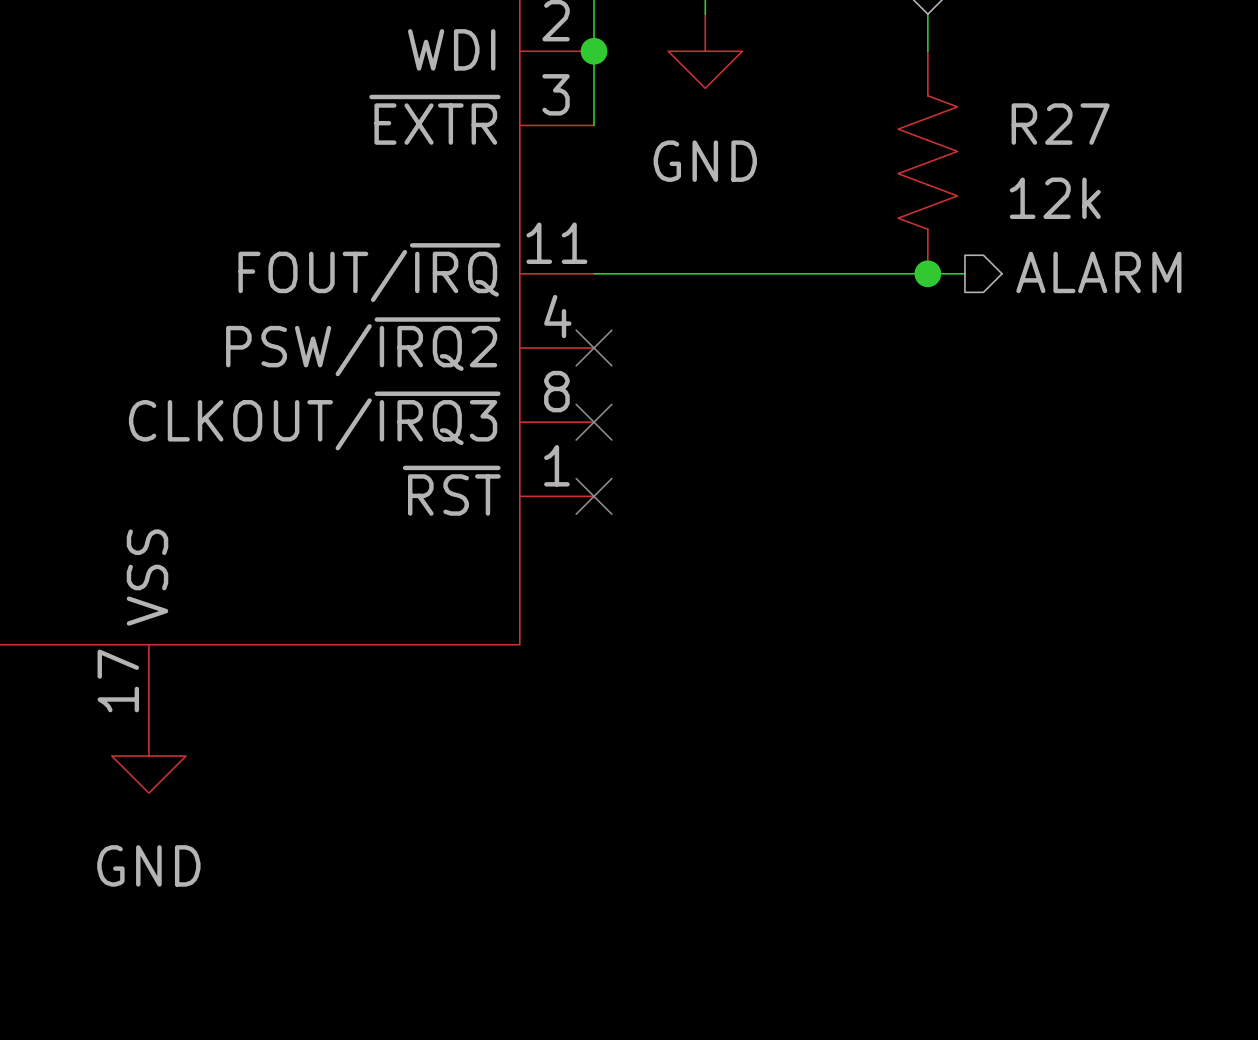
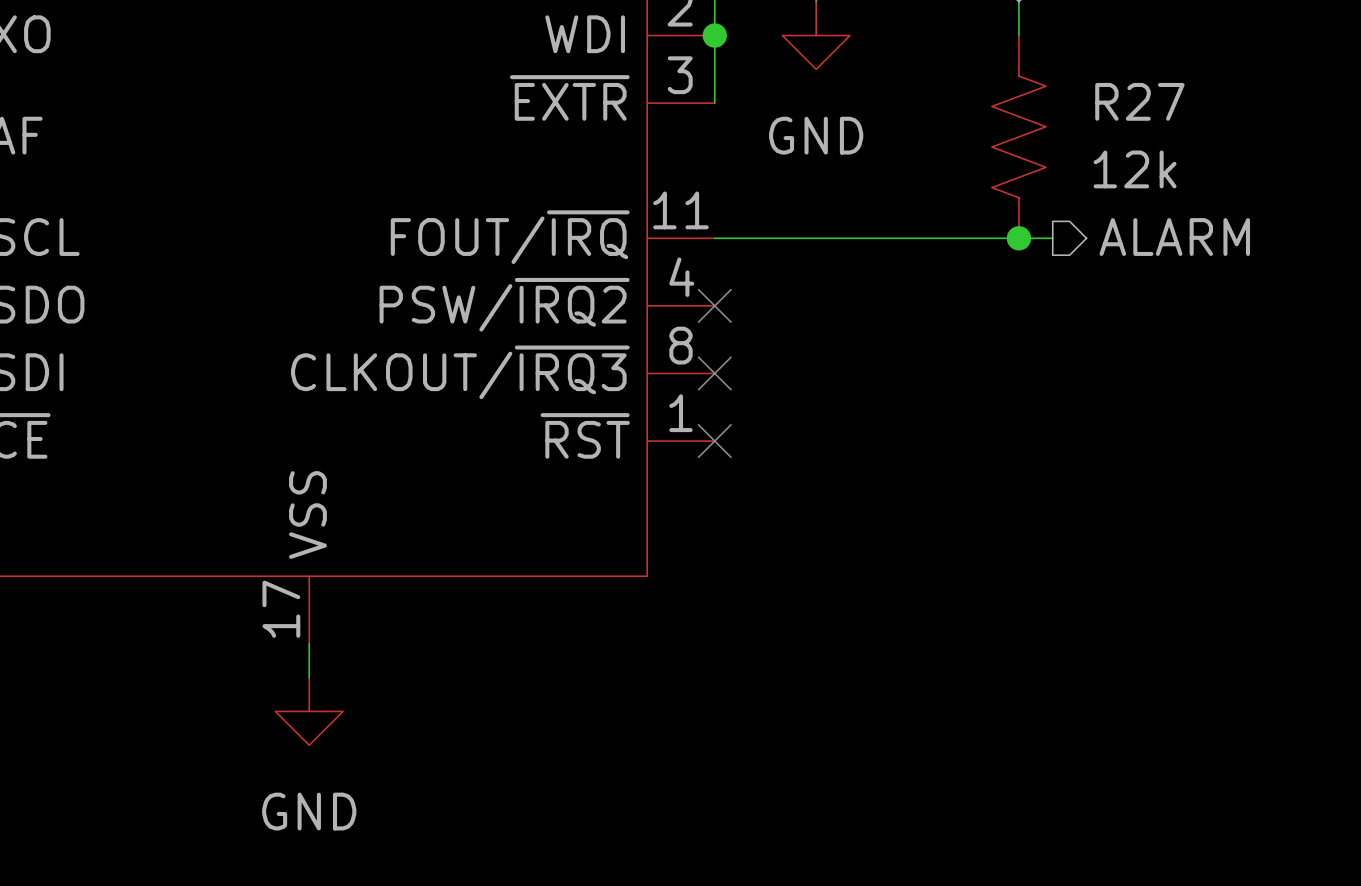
power symbol position: GND (148, 756) -> GND (309, 711)

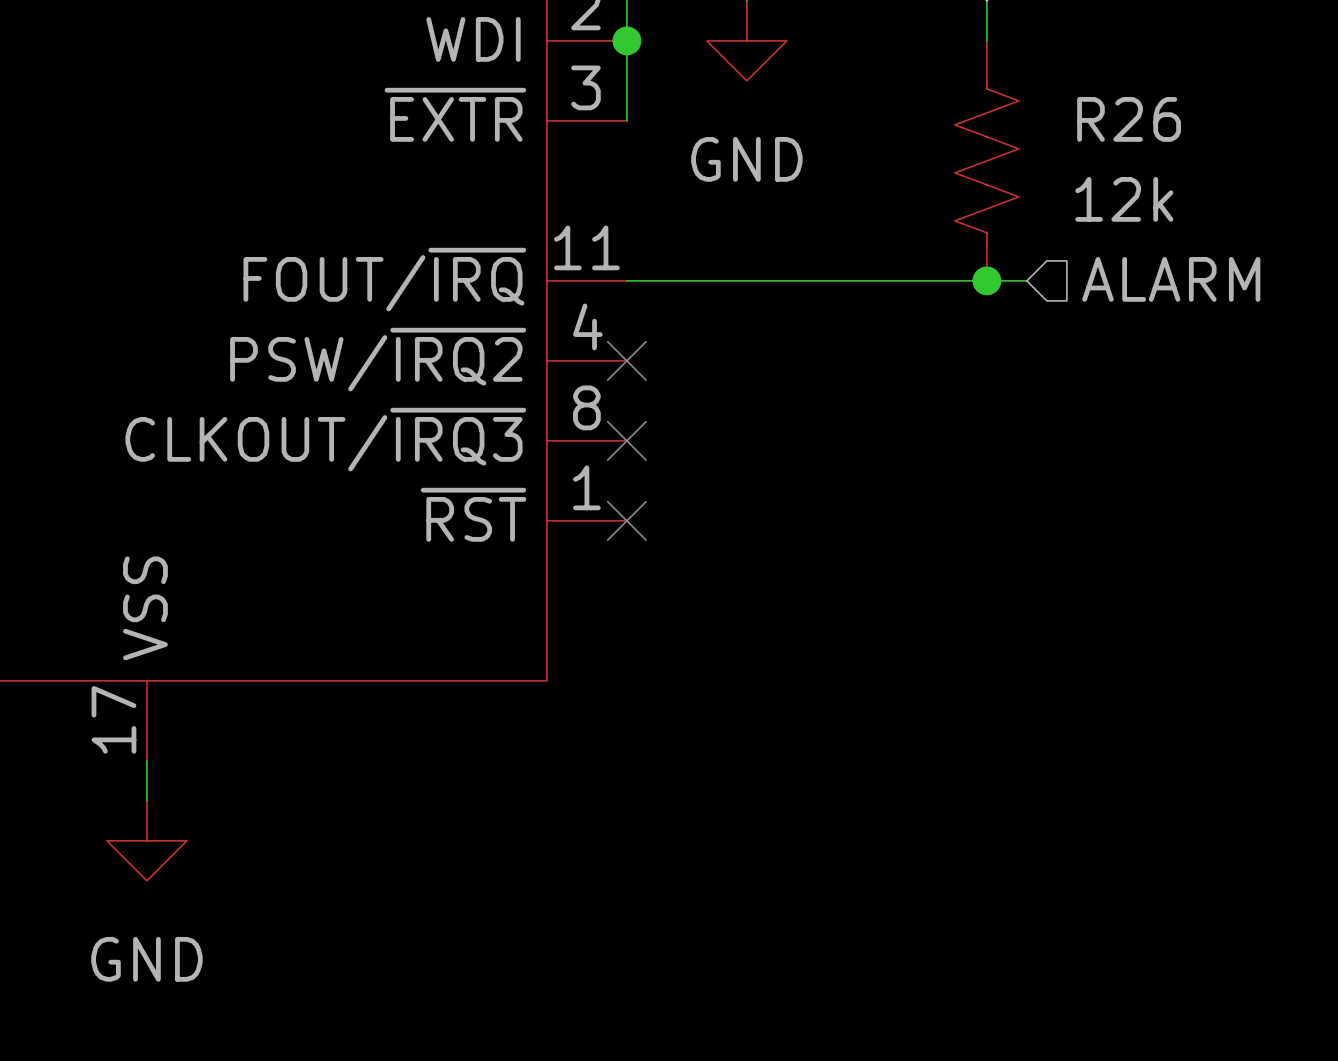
R27 name: R27 (1139, 101) -> R26 (1129, 119)
hierarchical label shape: output (1174, 237) -> input (1171, 279)

